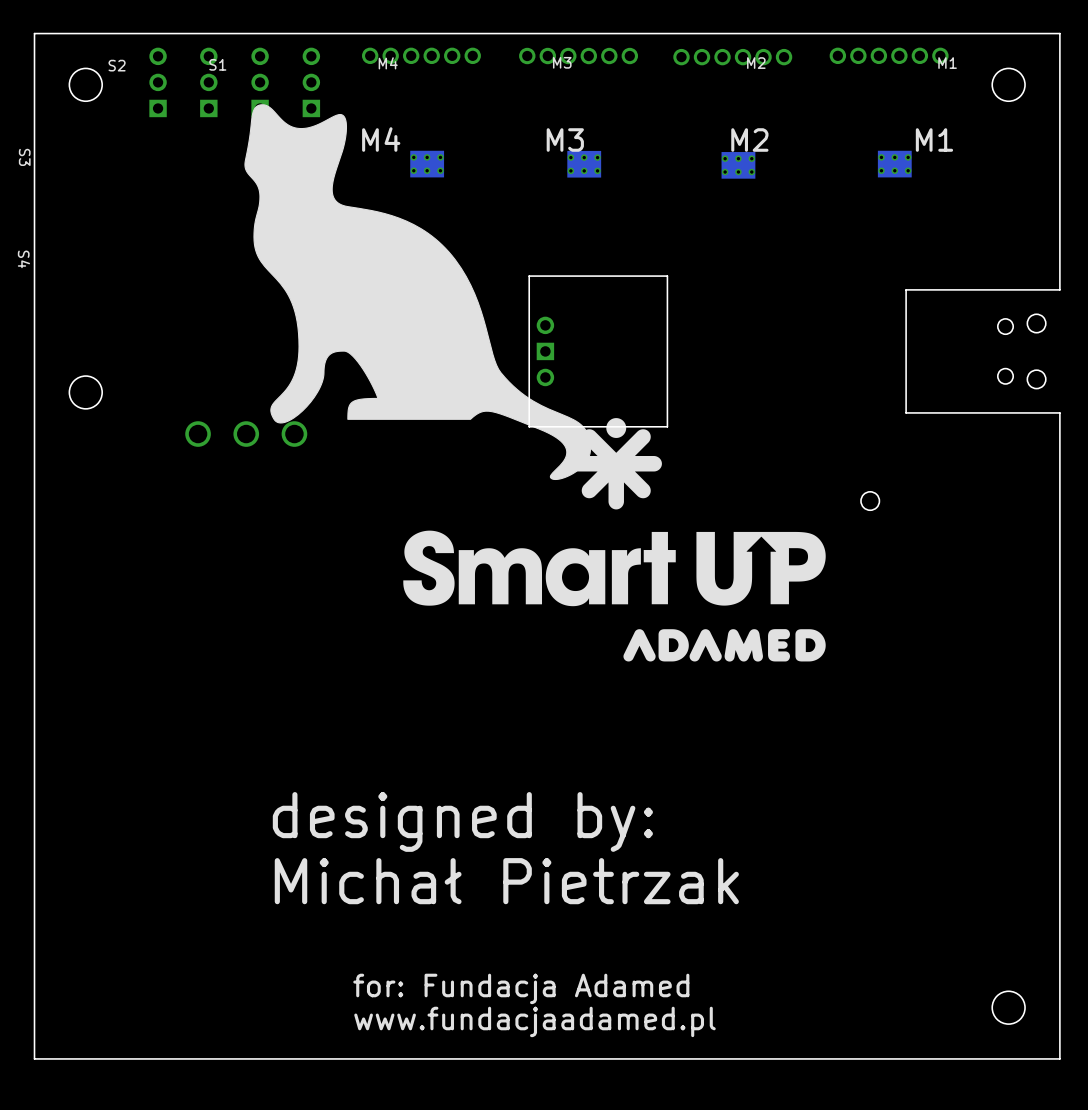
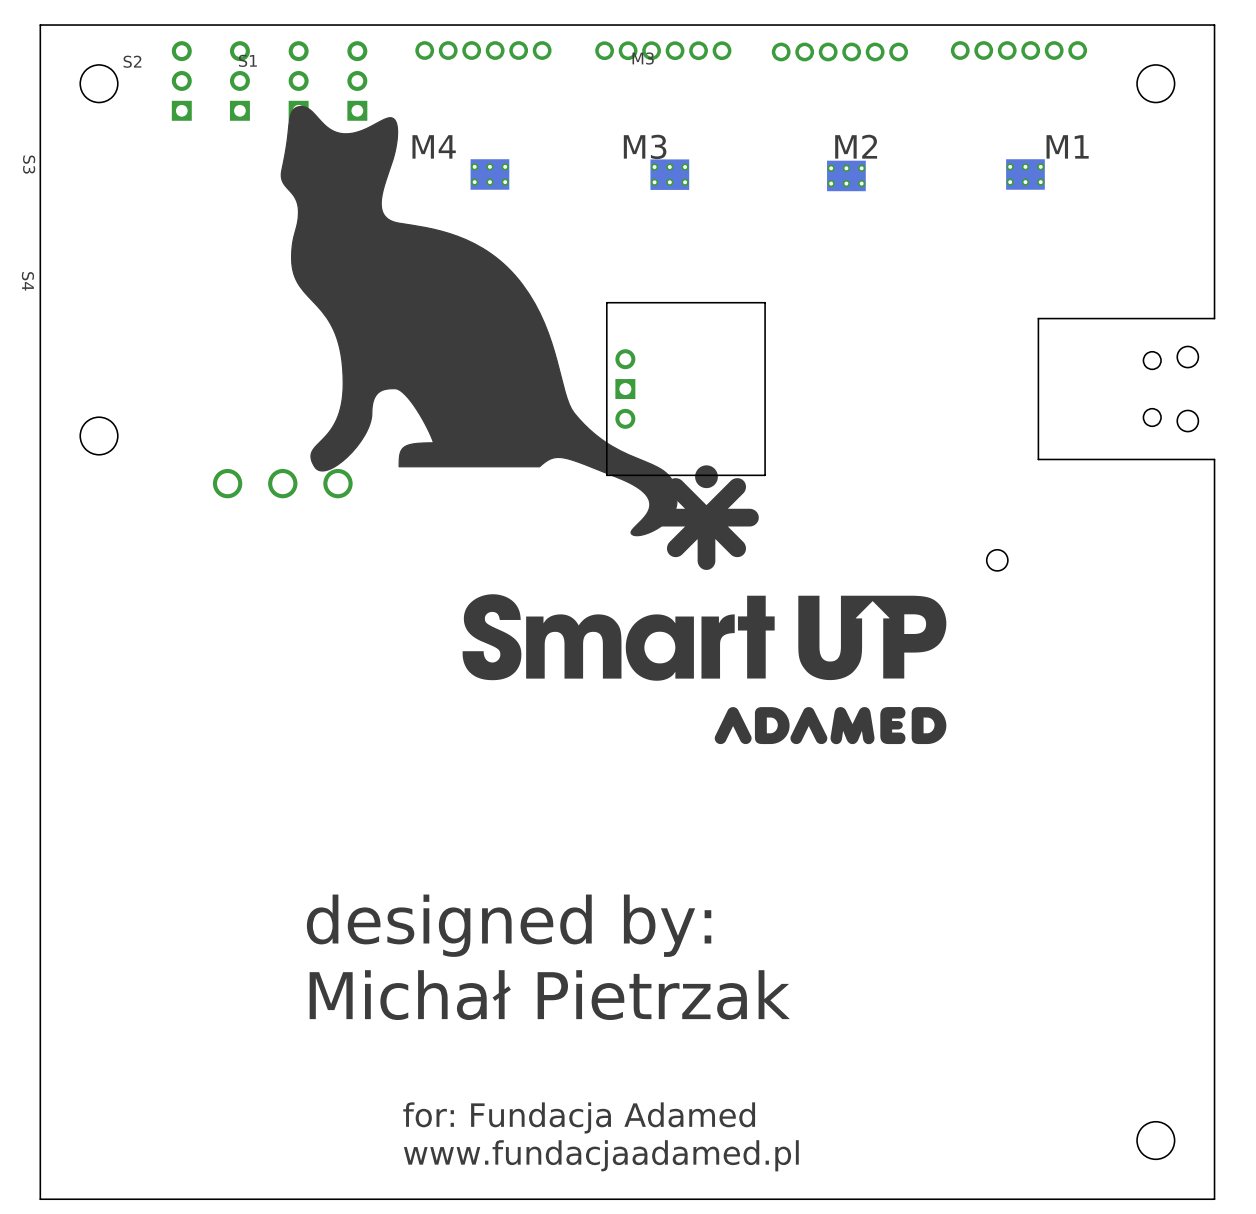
text: M4 (388, 63) -> none
text: M2 (756, 63) -> none
text: M1 (947, 63) -> none

